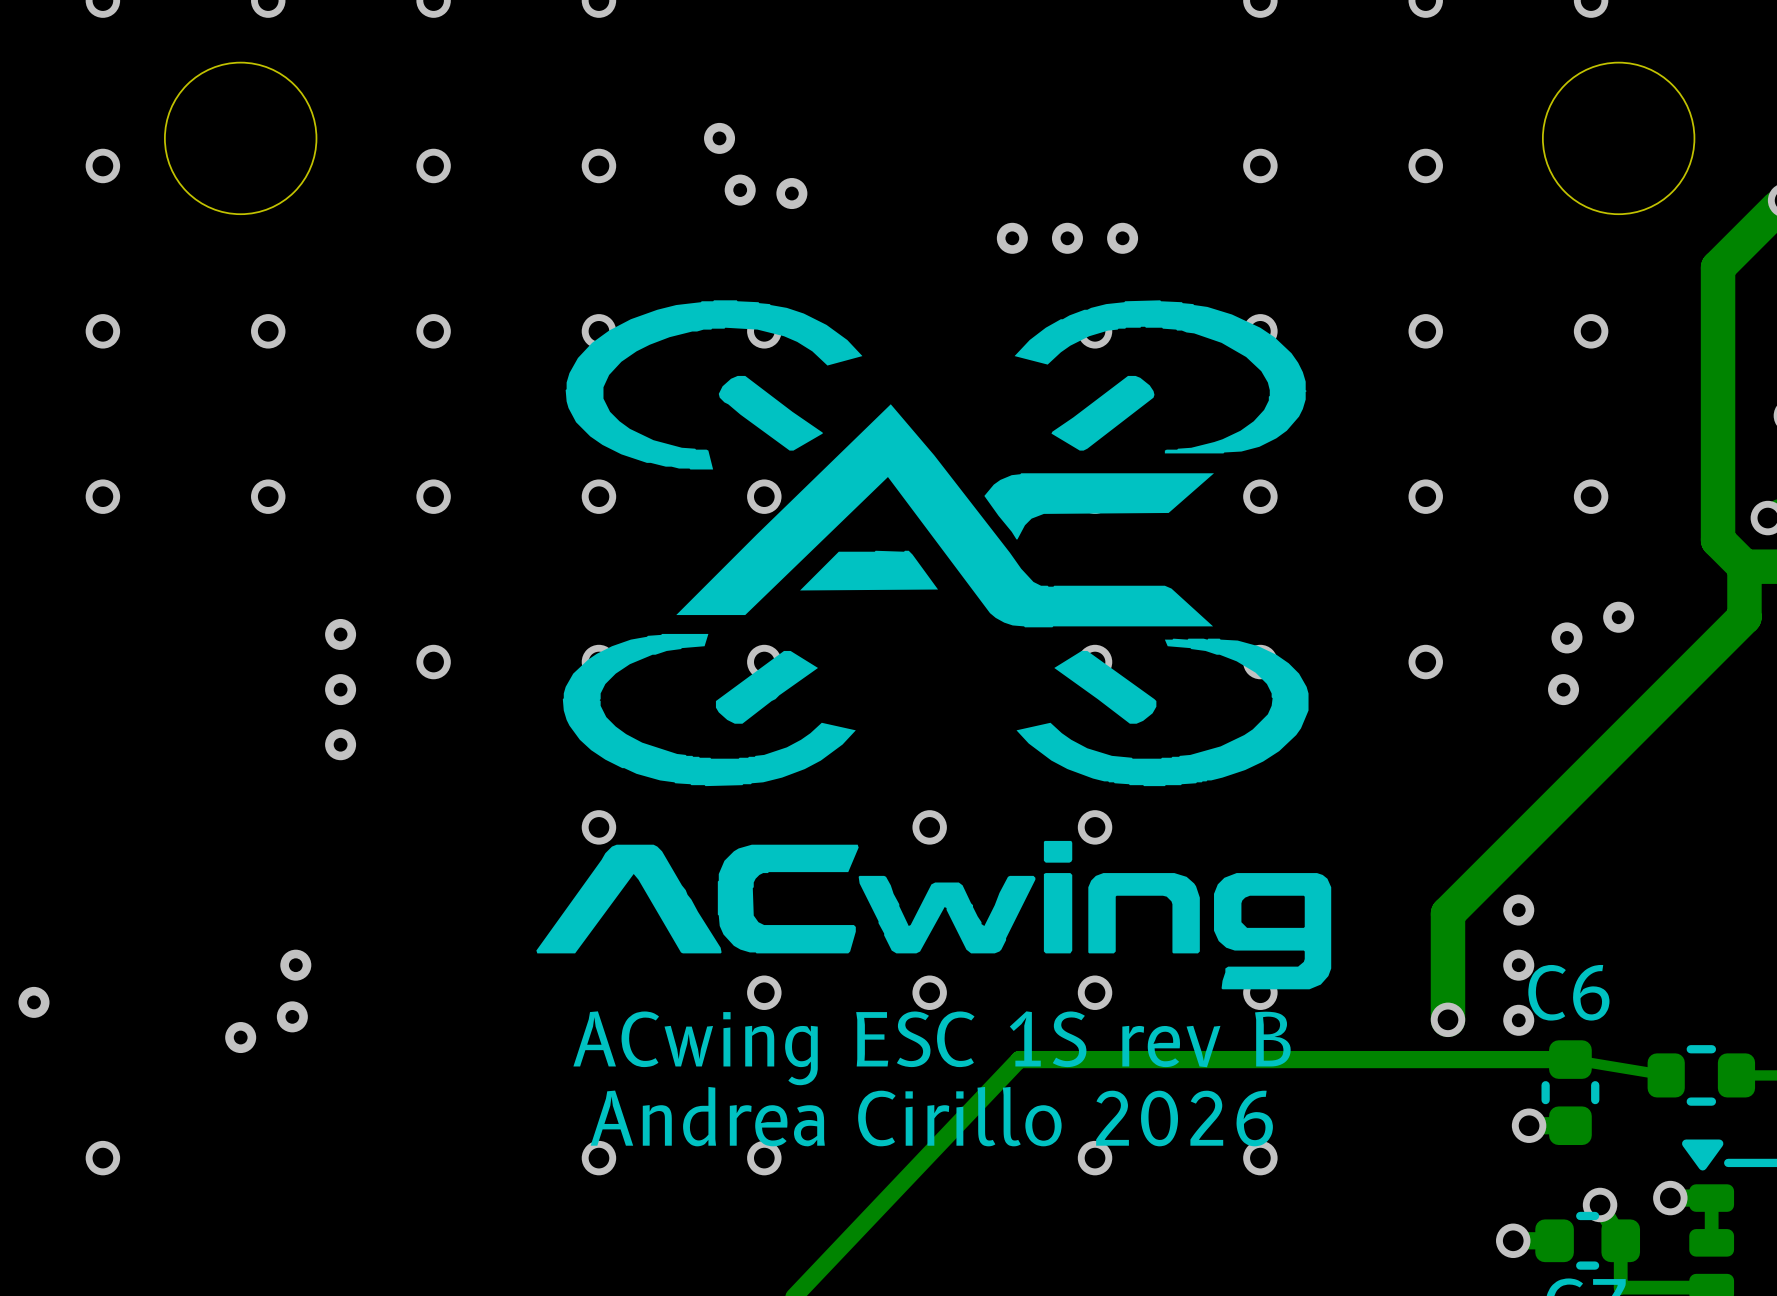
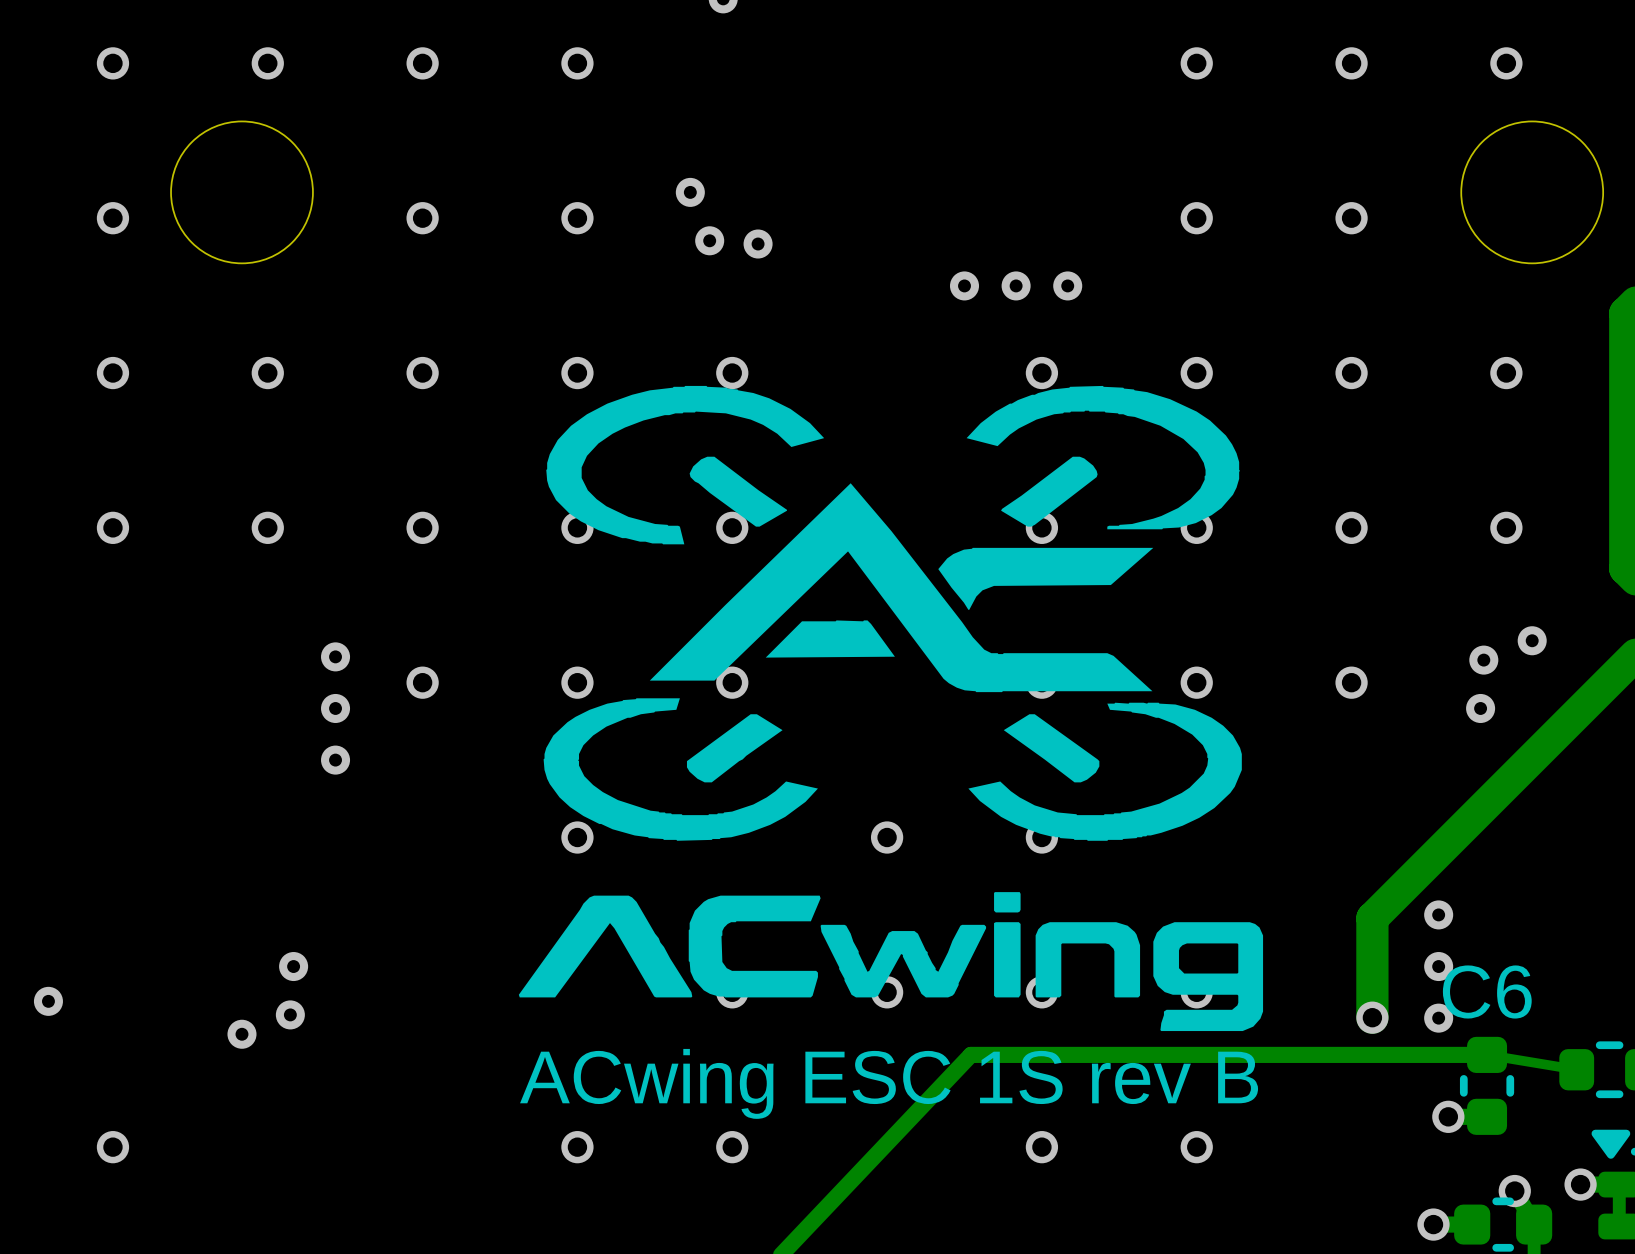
drawing position: (933, 644) -> (890, 708)
text position: ACwing ESC 1S rev B (932, 1048) -> ACwing ESC 1S rev B (889, 1083)
text: Andrea Cirillo 2026 (931, 1116) -> none

